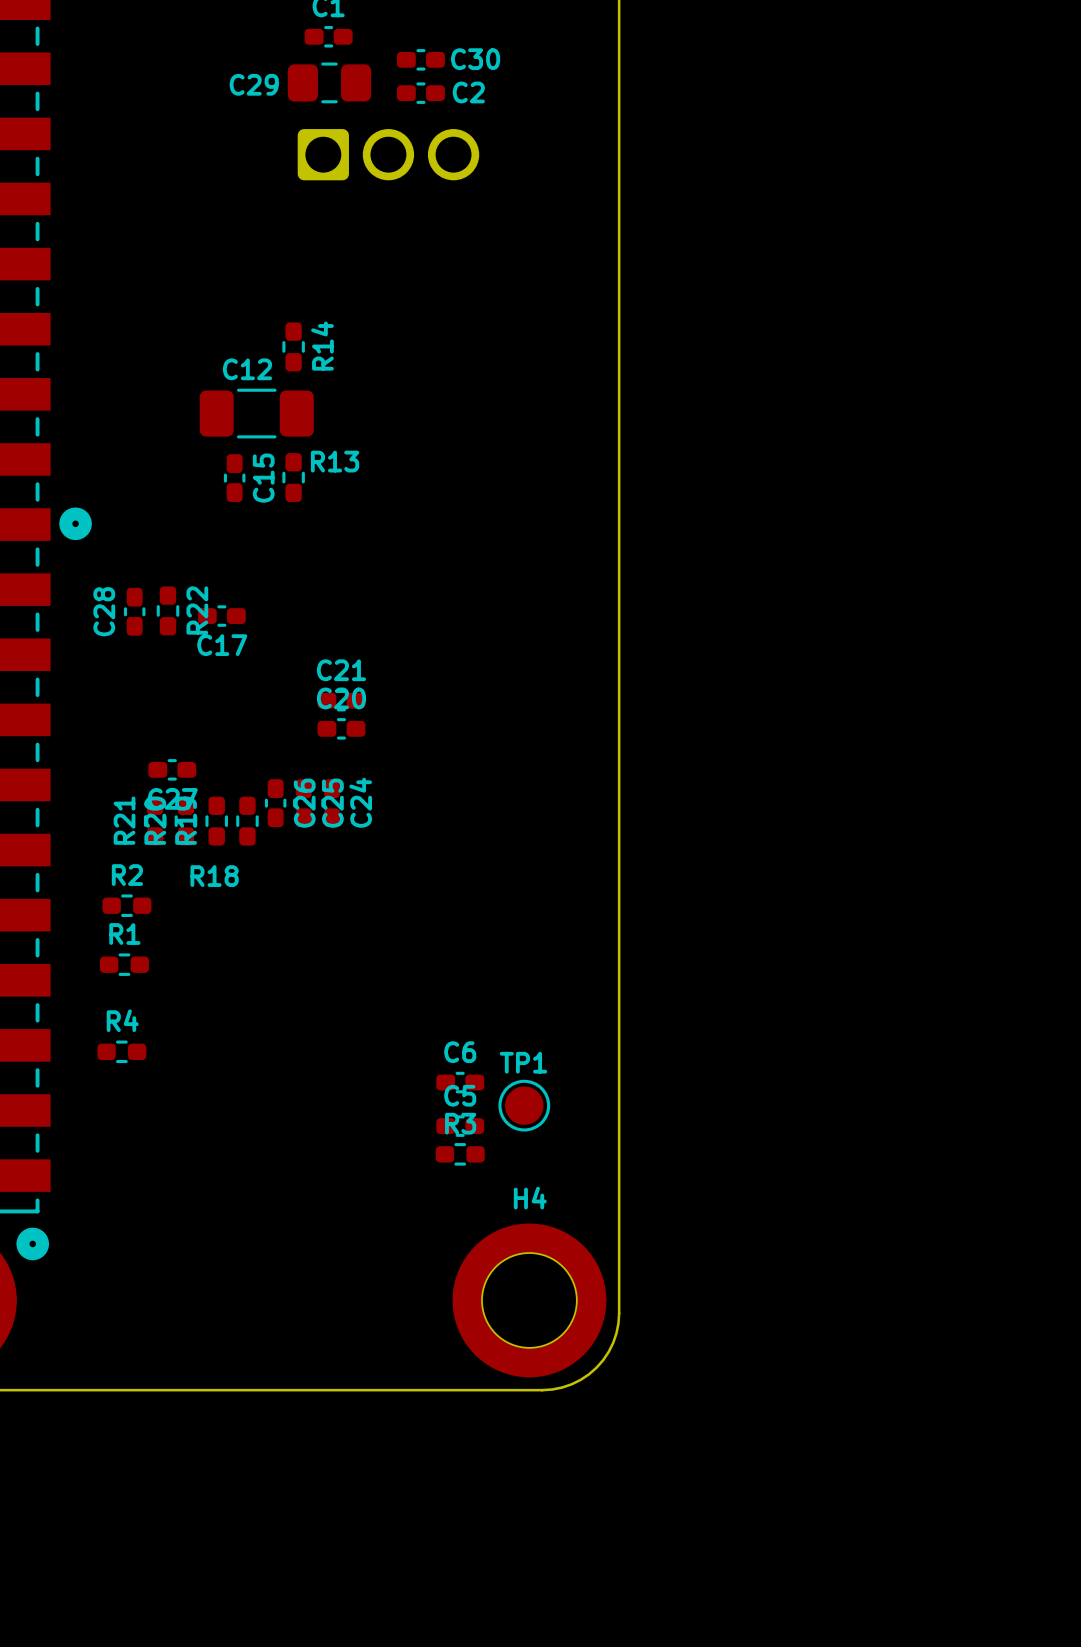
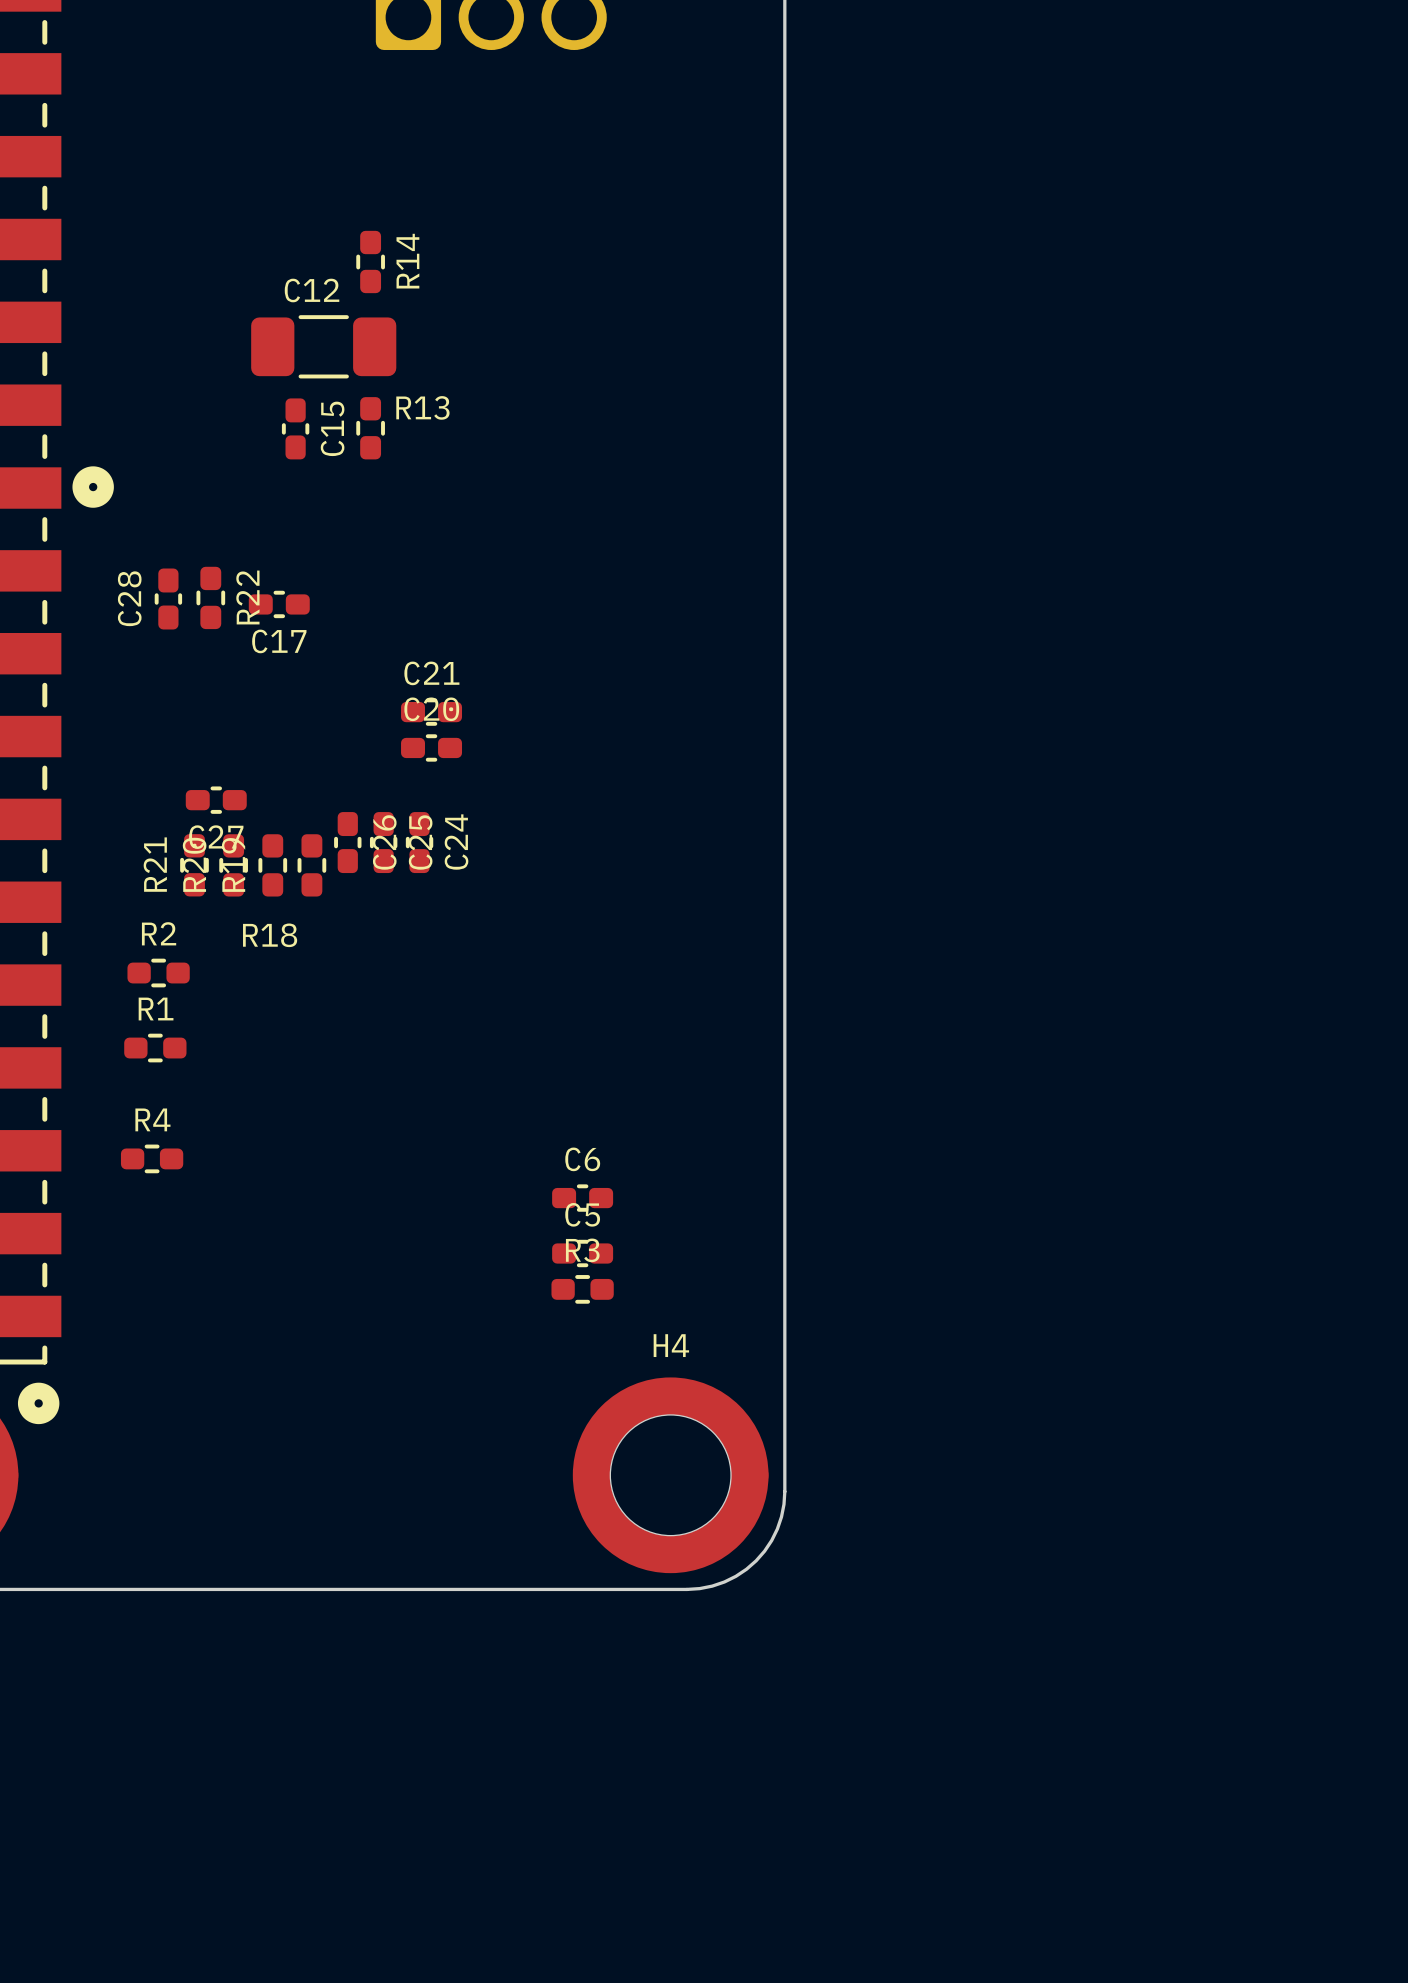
TP1: (524, 1105) -> none

